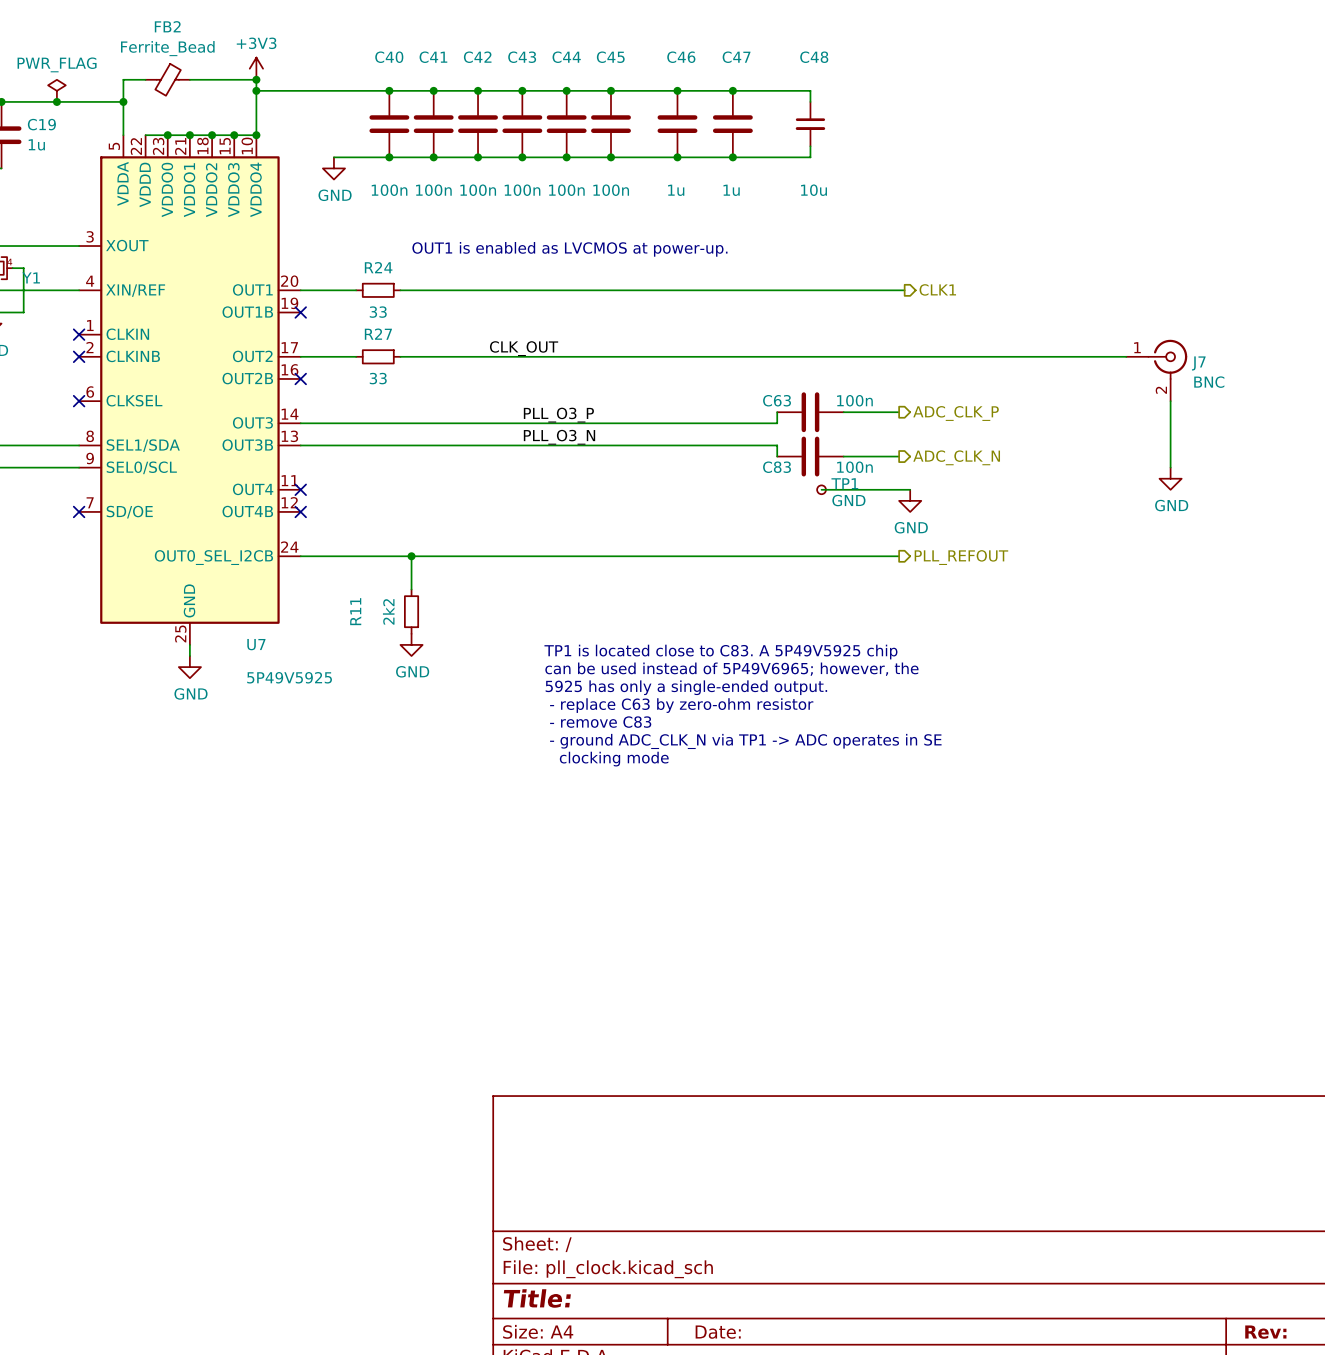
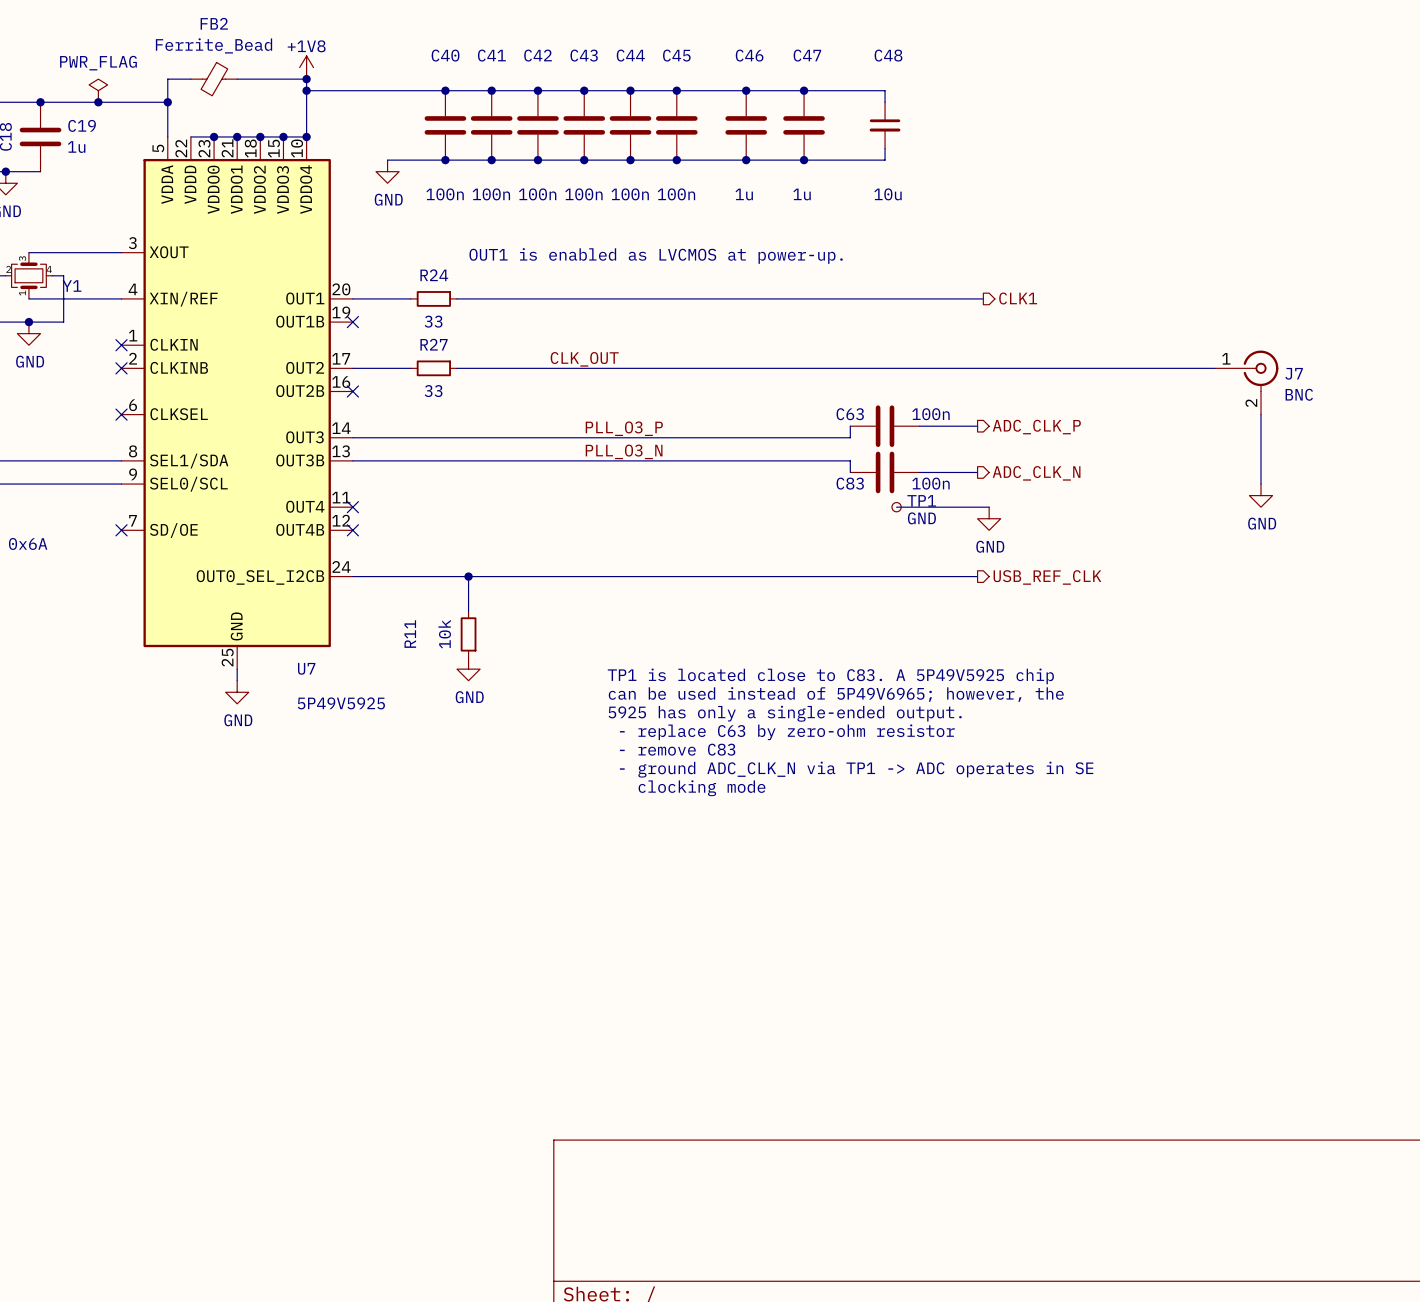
power symbol: +3V3 (256, 68) -> +1V8 (306, 67)
hierarchical label: PLL_REFOUT (961, 557) -> USB_REF_CLK (1047, 577)
R11 value: 2k2 (388, 611) -> 10k (444, 634)

